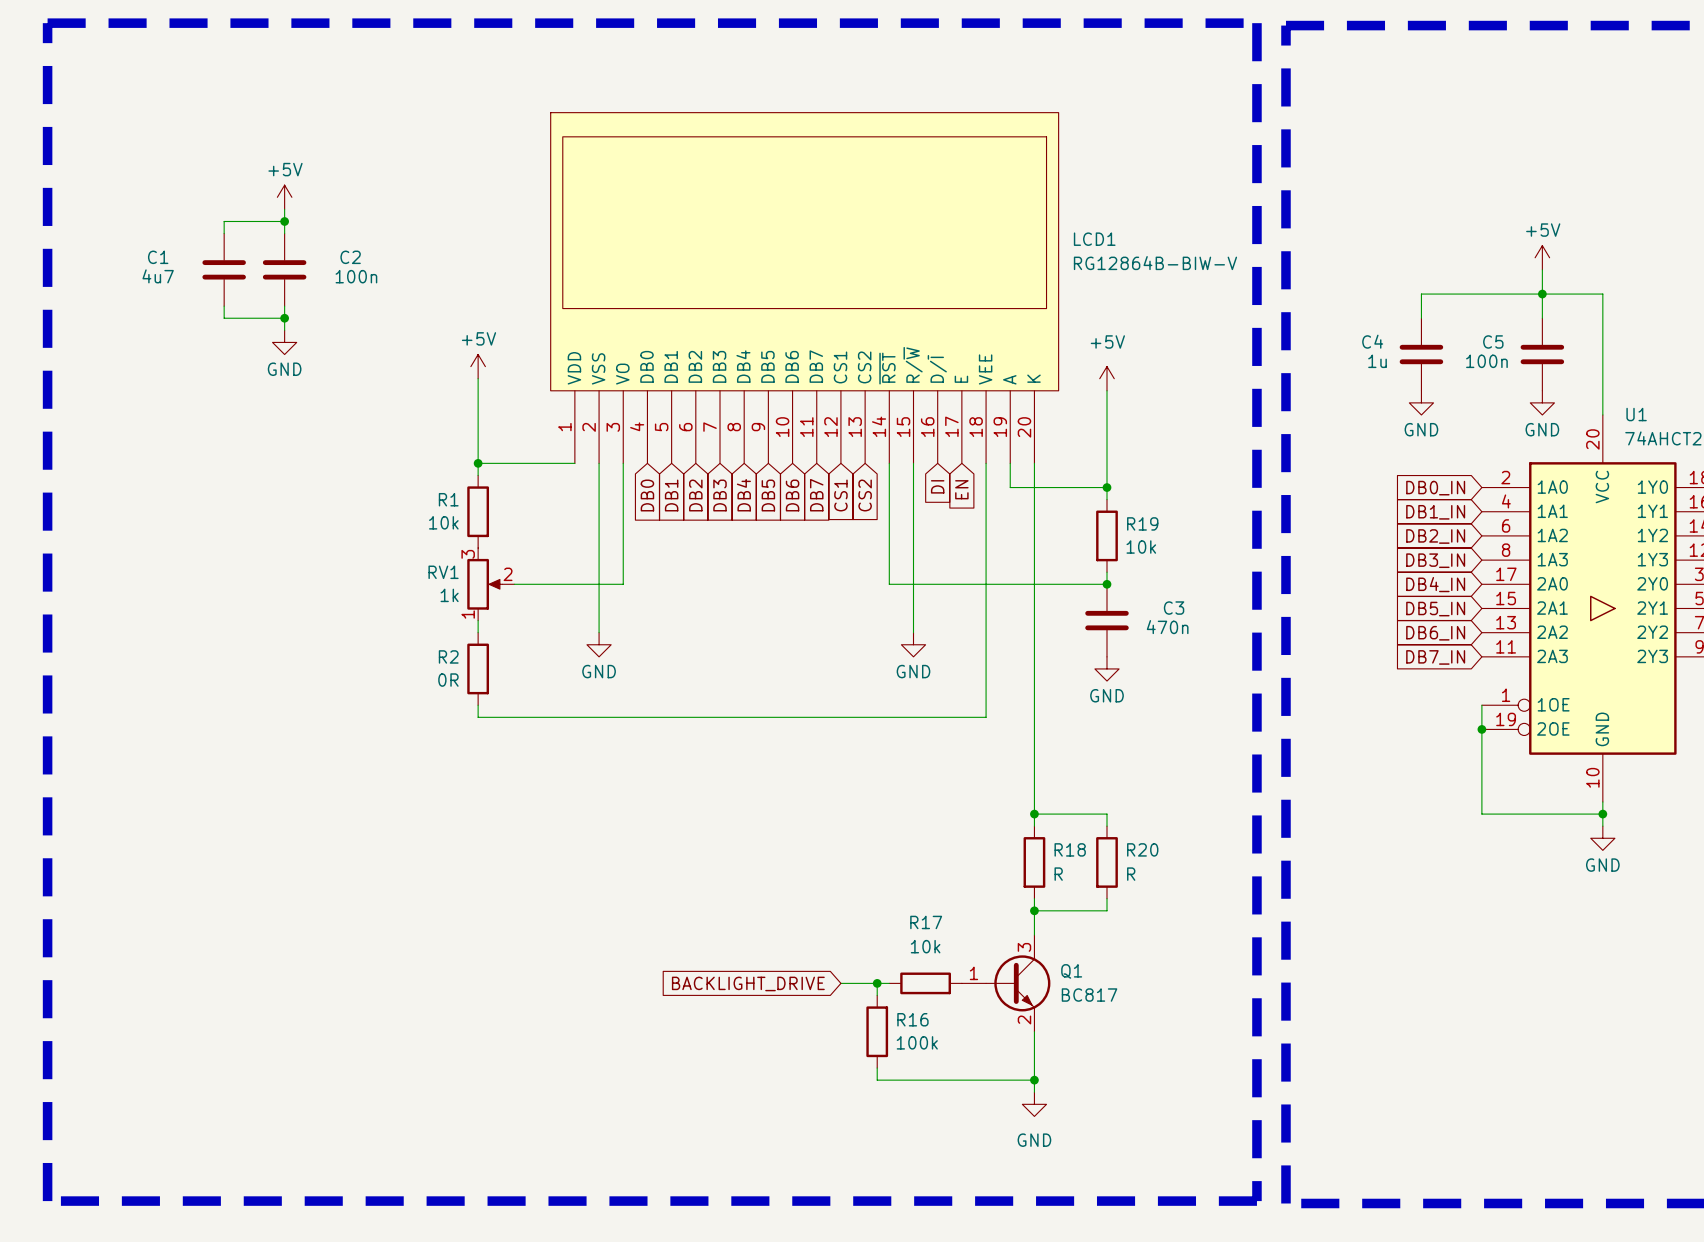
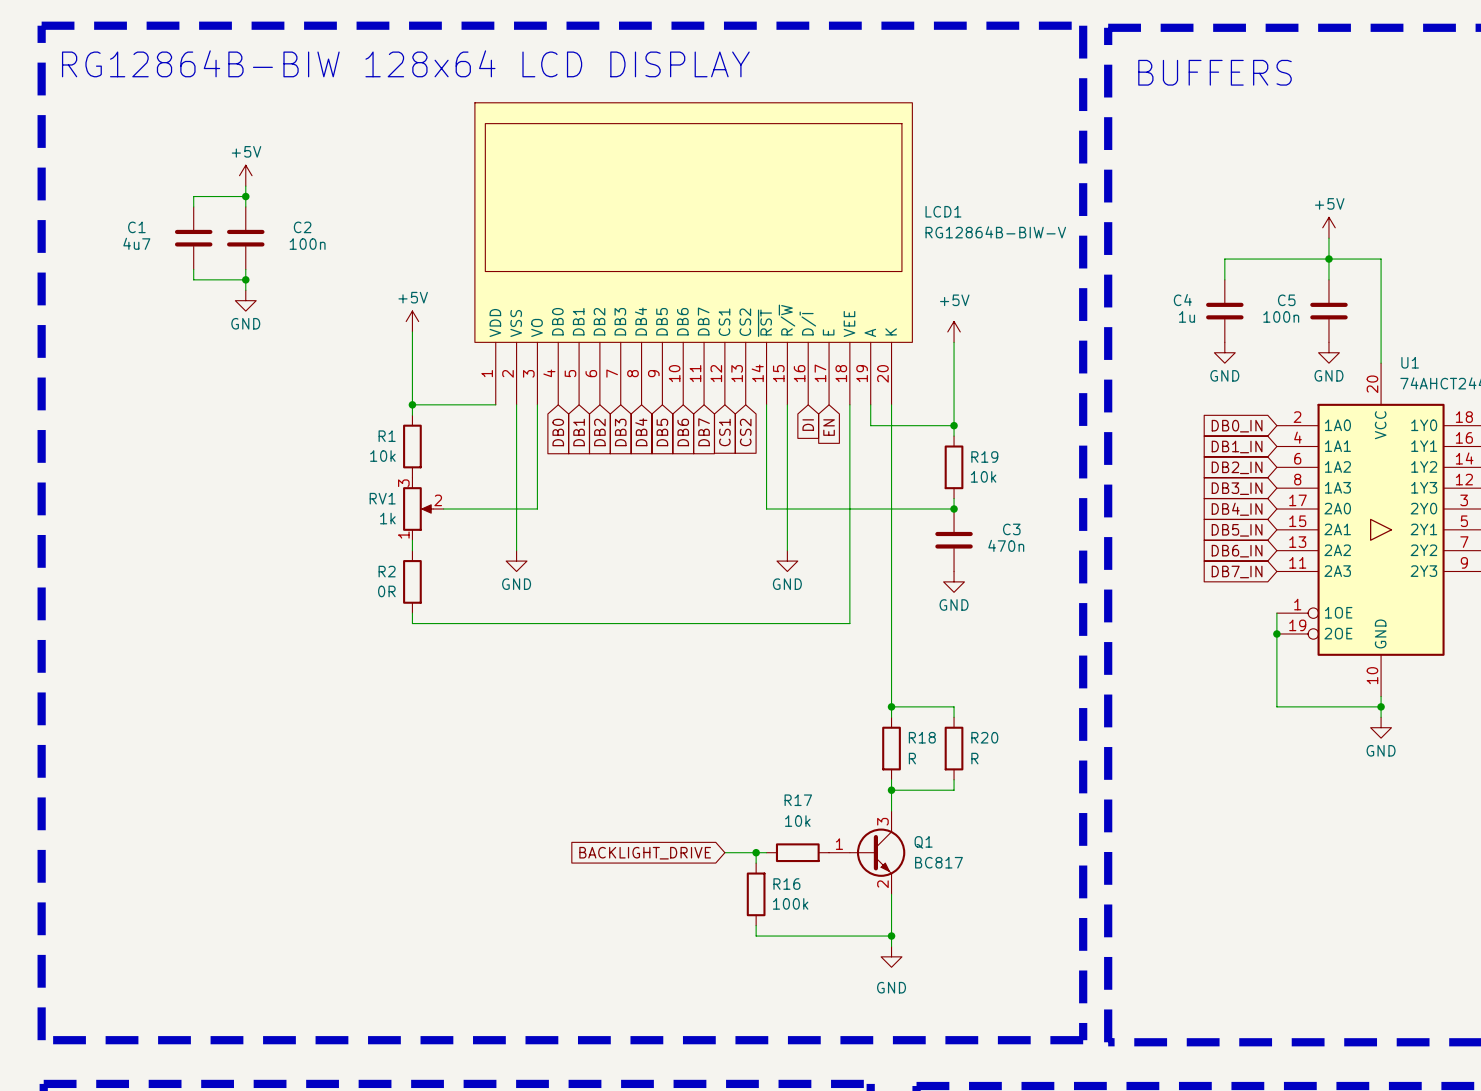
text: none -> RG12864B-BIW 128x64 LCD DISPLAY (405, 63)
text: none -> BUFFERS (1215, 72)

